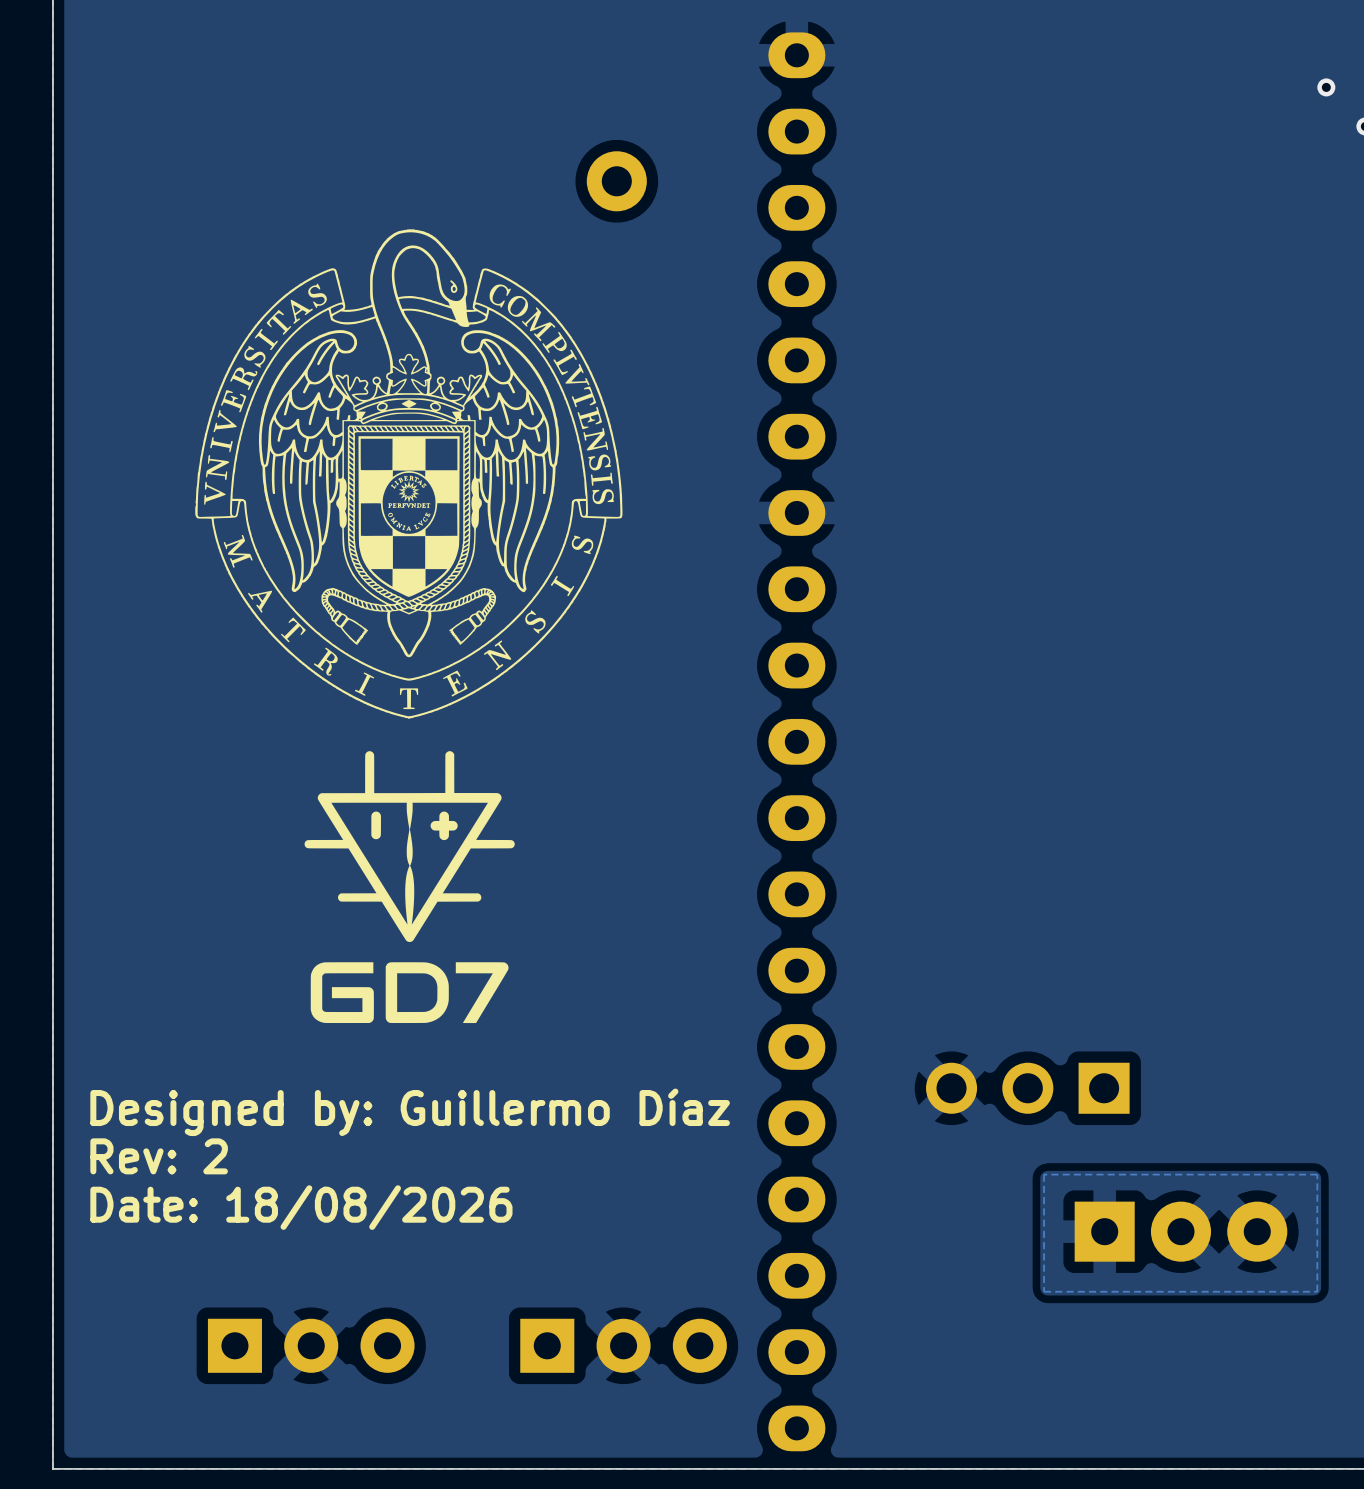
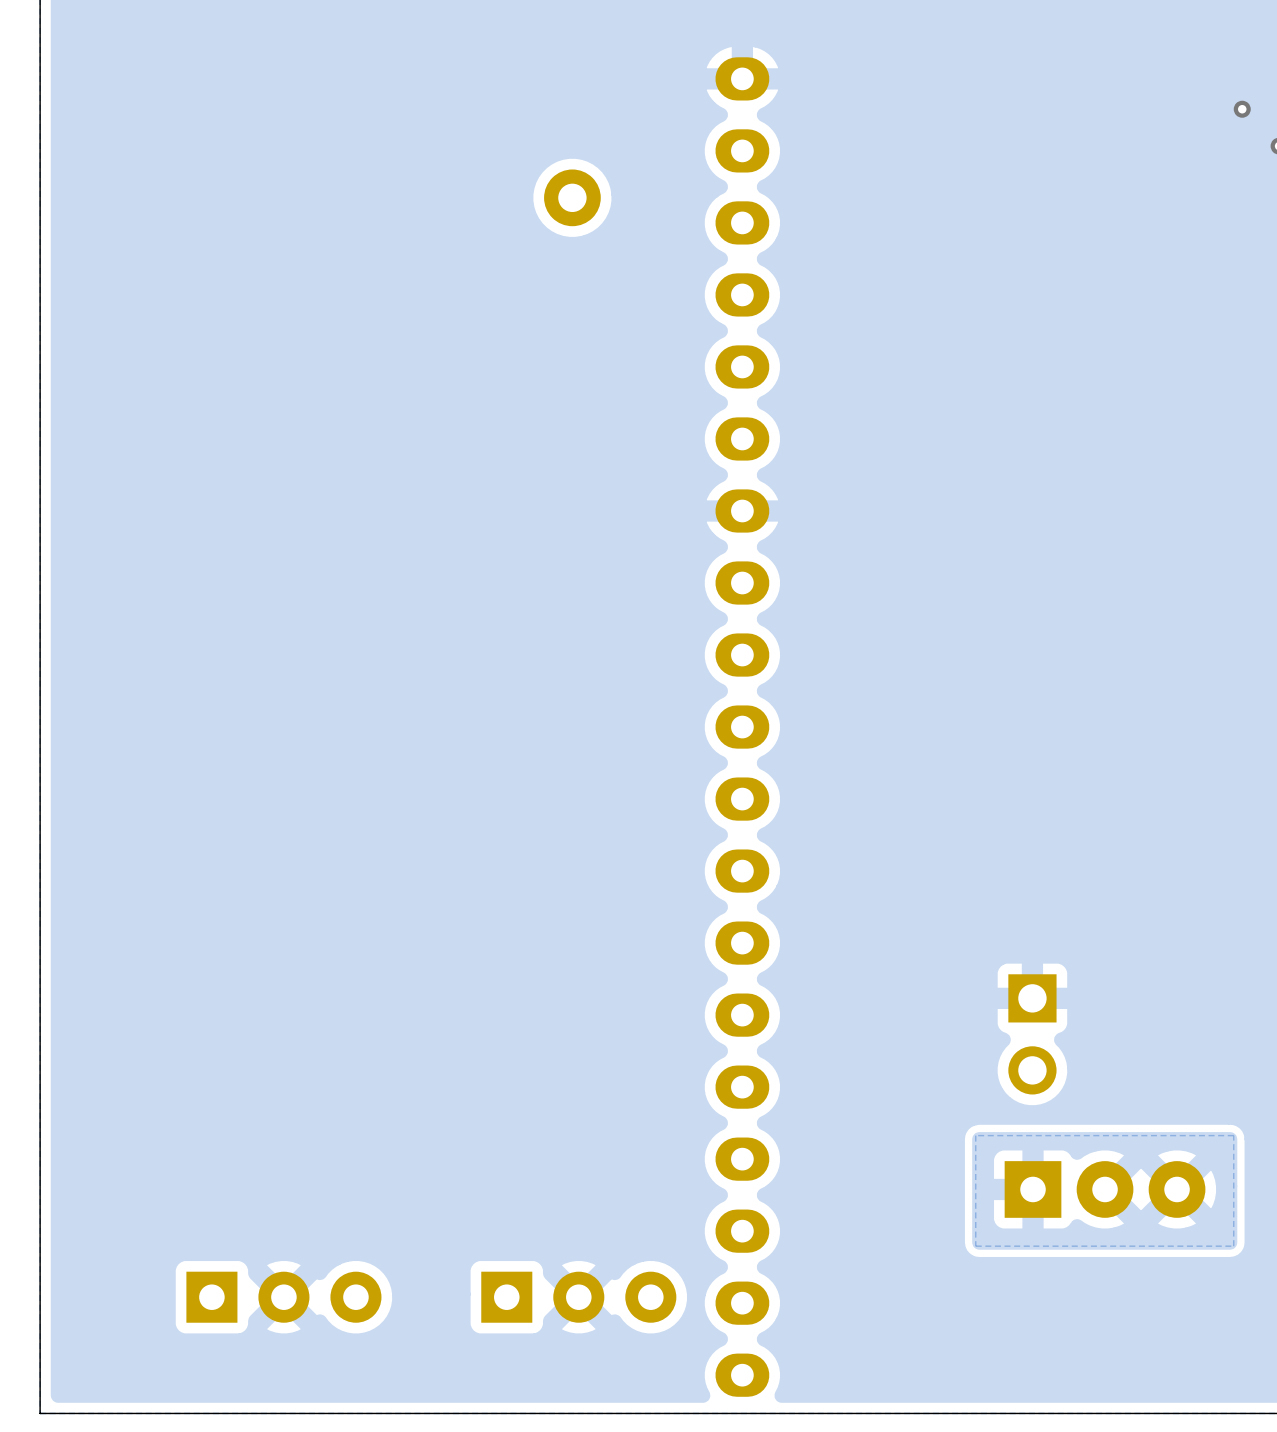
drawing: [195, 229, 623, 1024] -> none
part: none -> (1032, 1034)
part: (1027, 1088) -> none
text: Designed by: Guillermo Díaz (410, 1112) -> none
text: Rev: 2 (159, 1156) -> none
text: Date: 18/08/2026 (301, 1207) -> none

